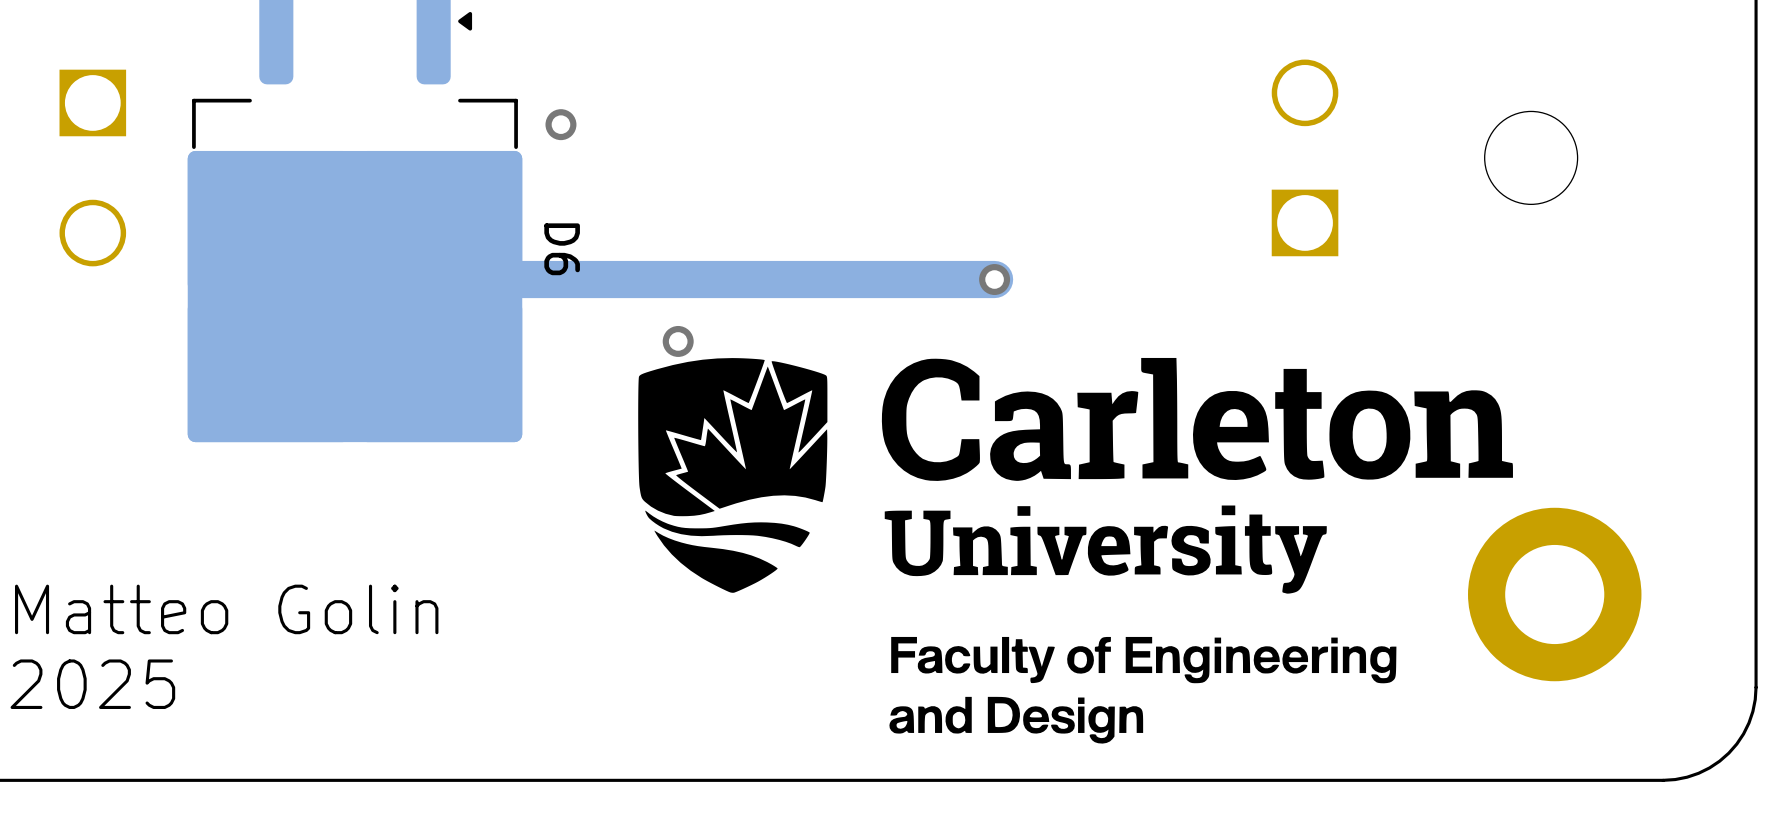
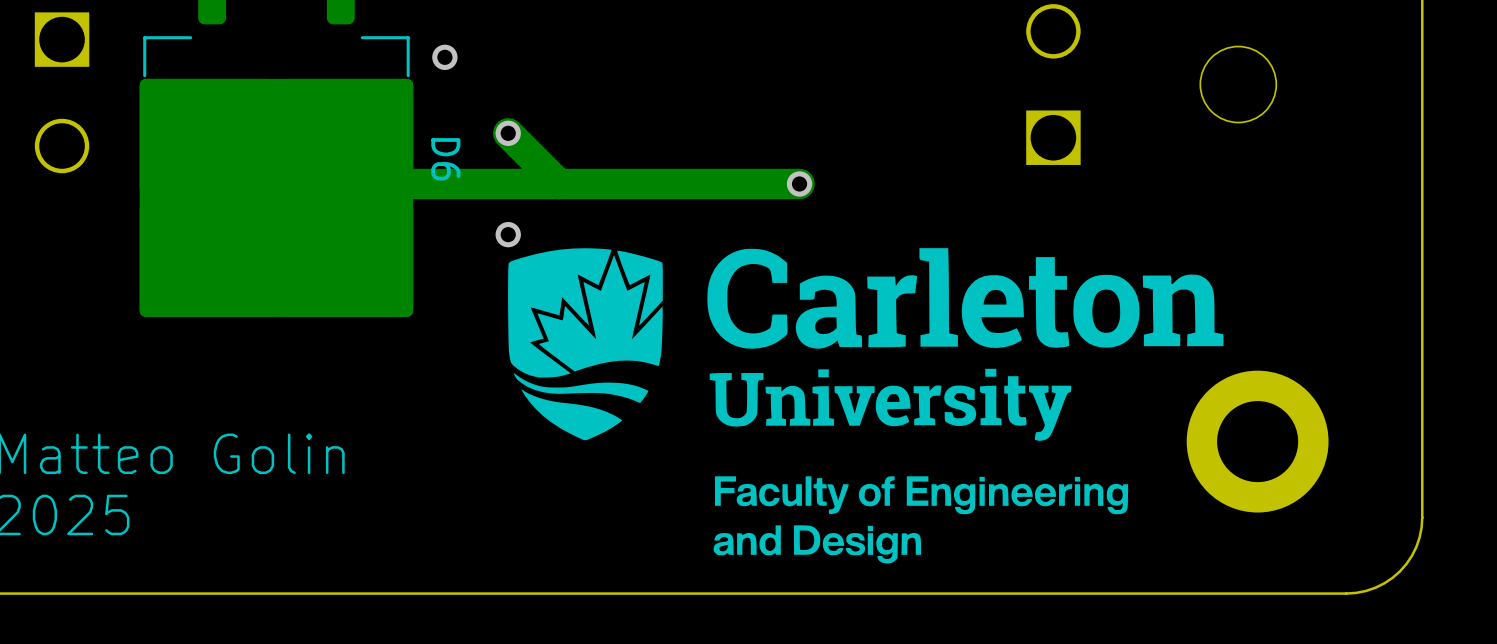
track: none -> (508, 133) (558, 183)
via: none -> (508, 133)
via position: (678, 341) -> (508, 234)

